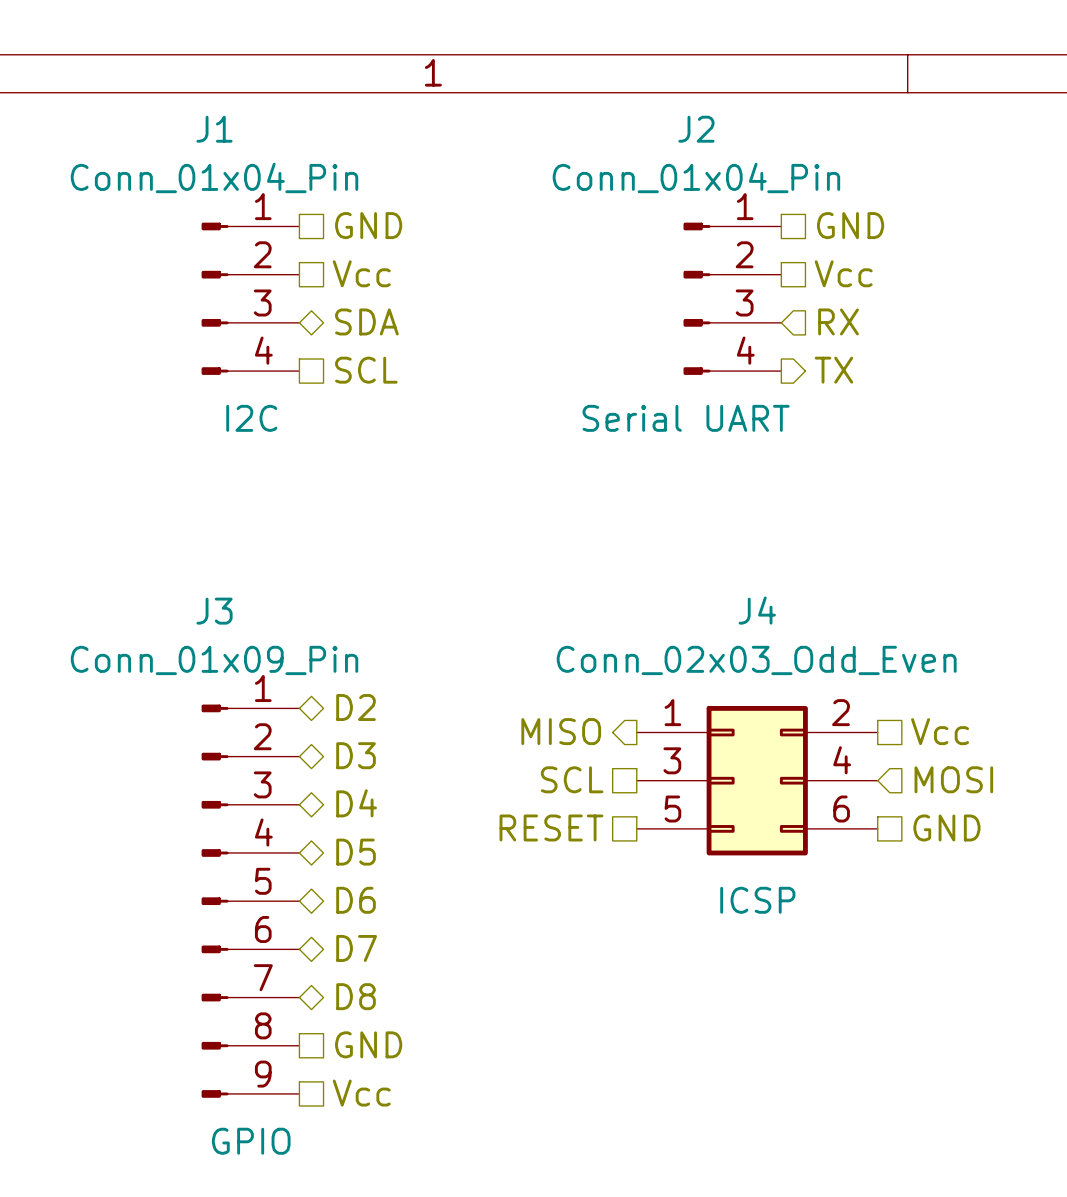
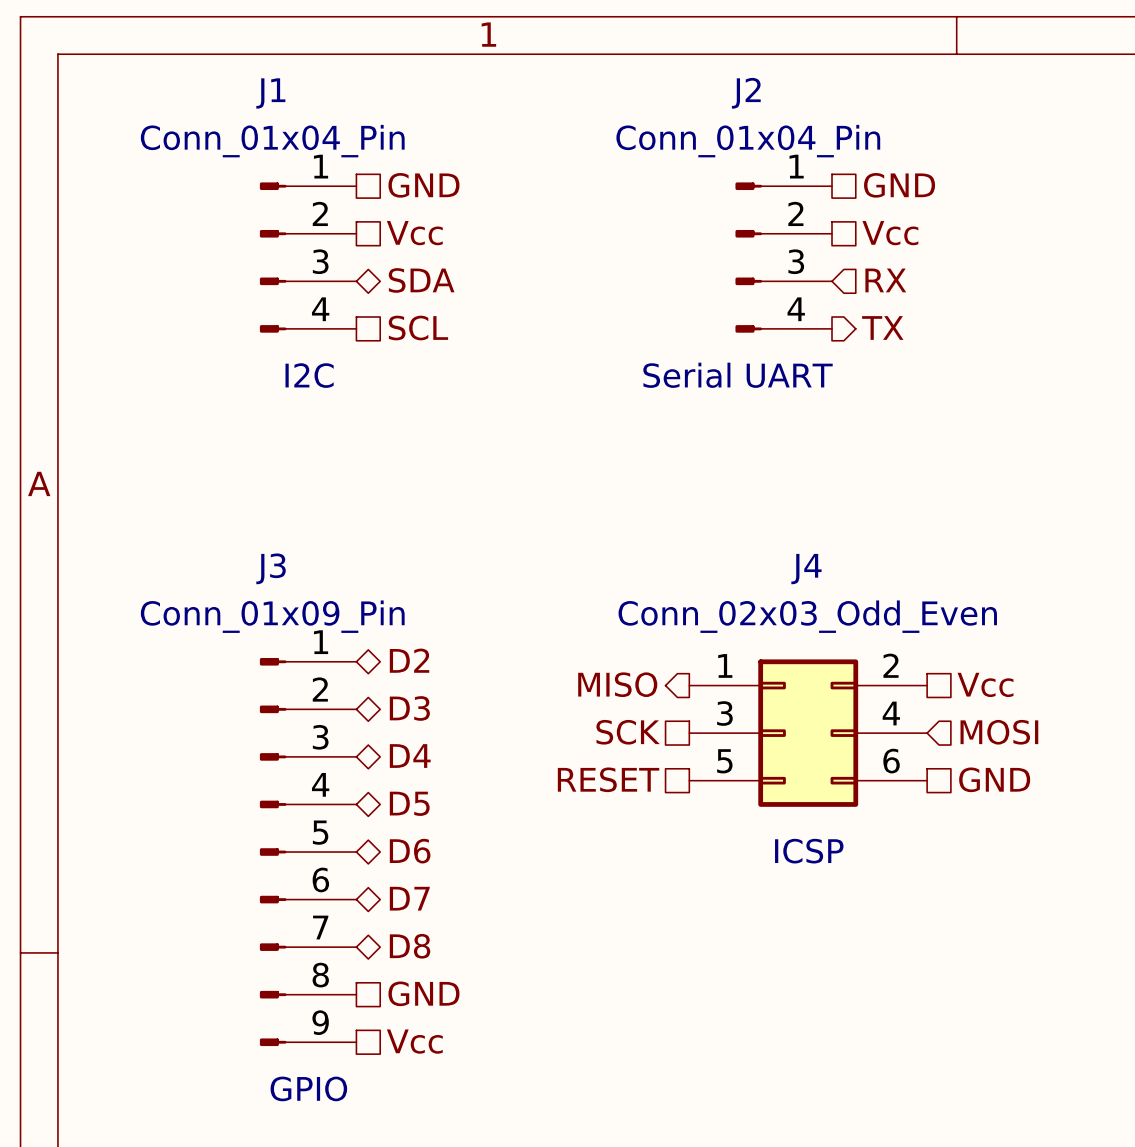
hierarchical label: SCL (572, 779) -> SCK (628, 732)

